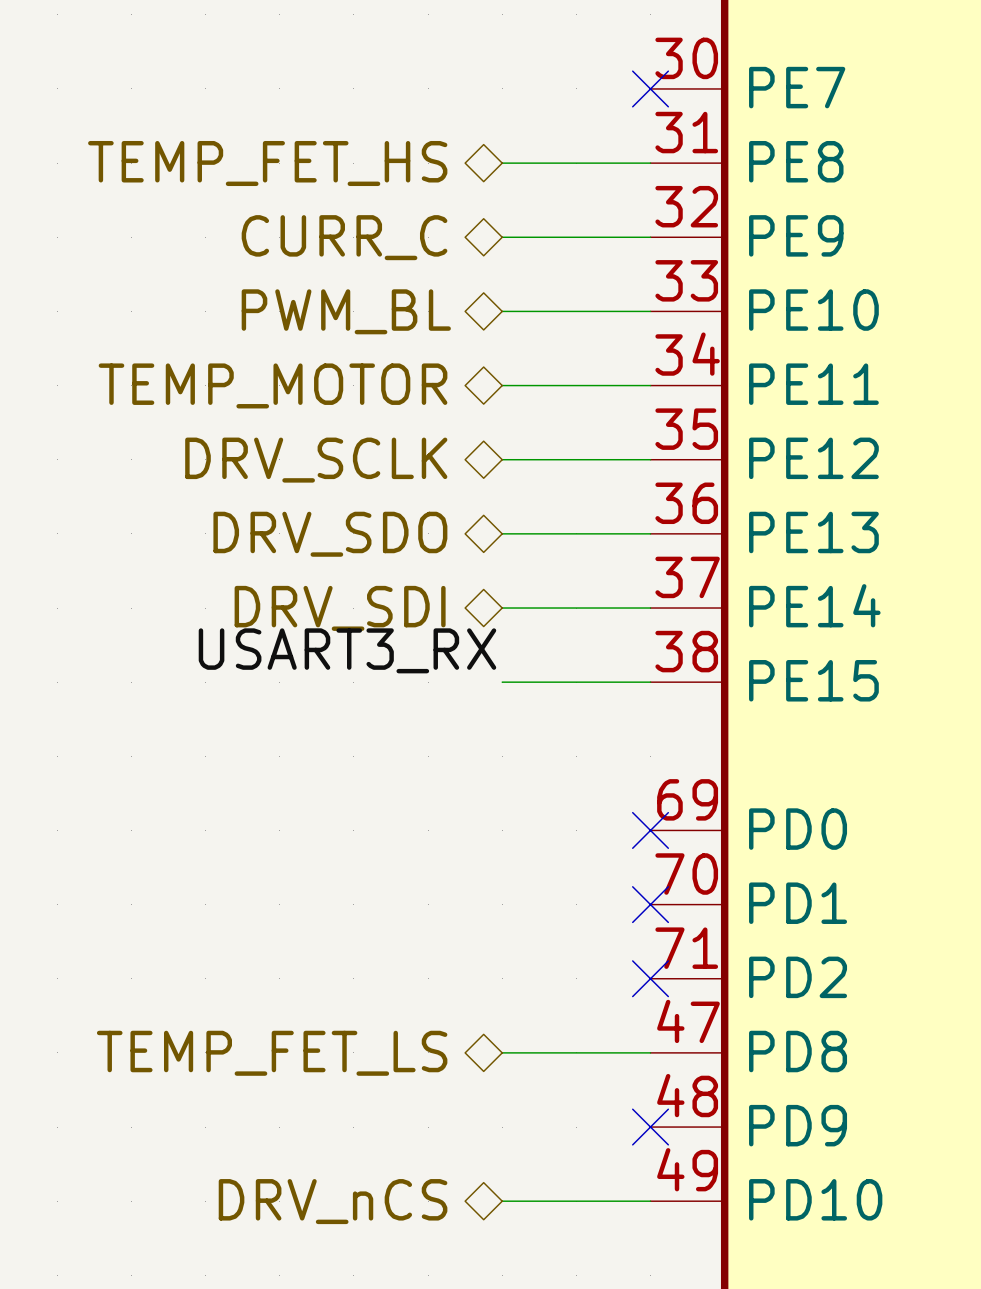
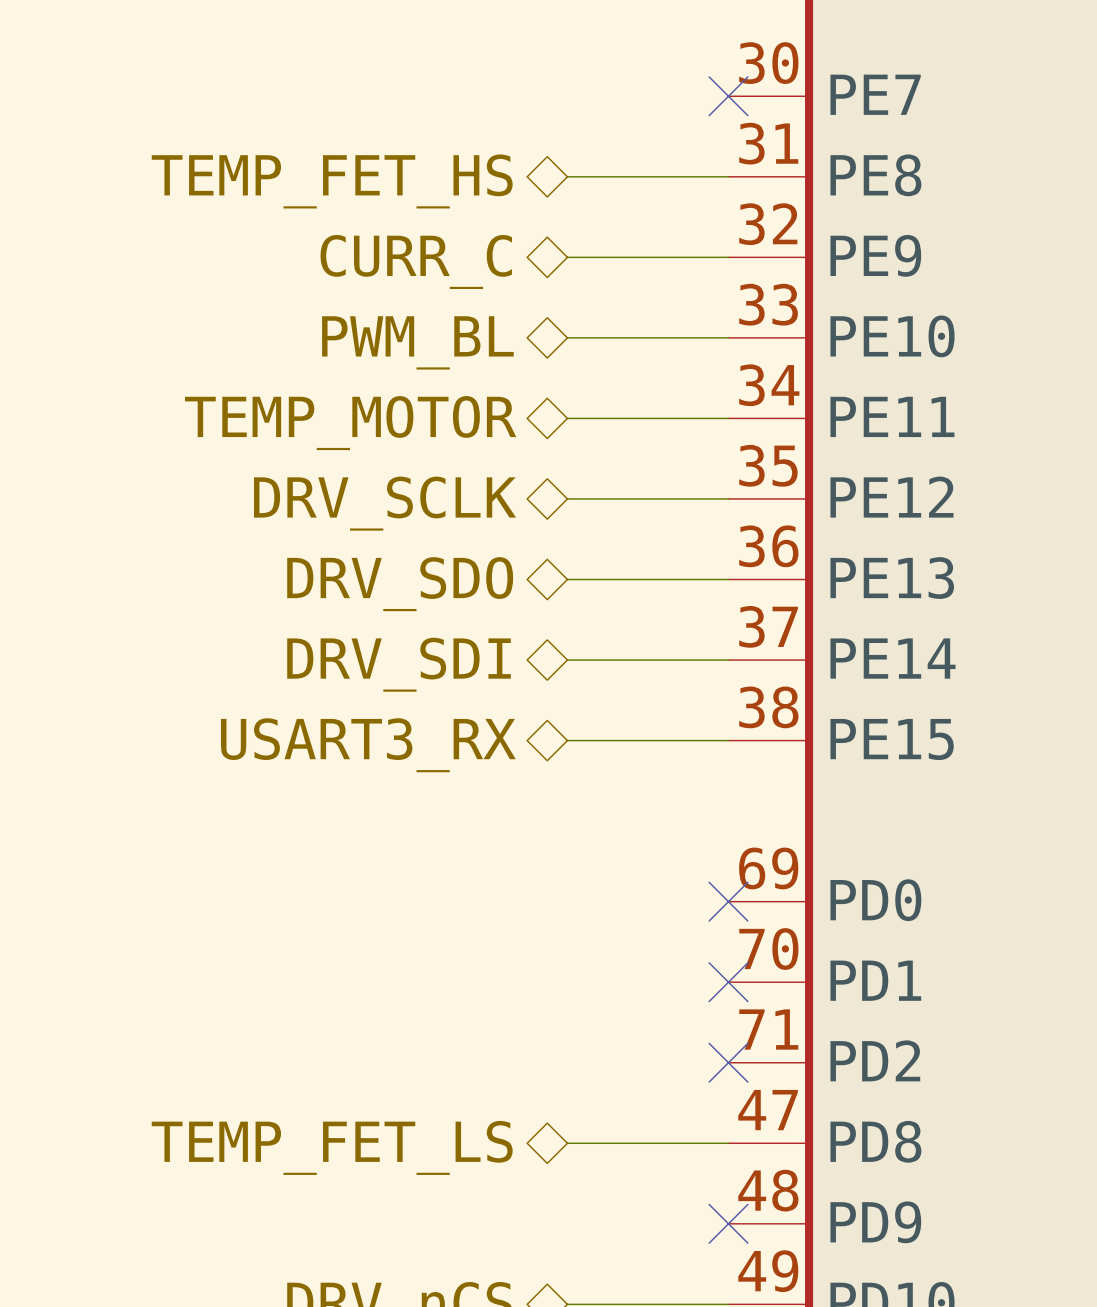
label: USART3_RX (347, 650) -> none
hierarchical label: none -> USART3_RX (368, 745)

